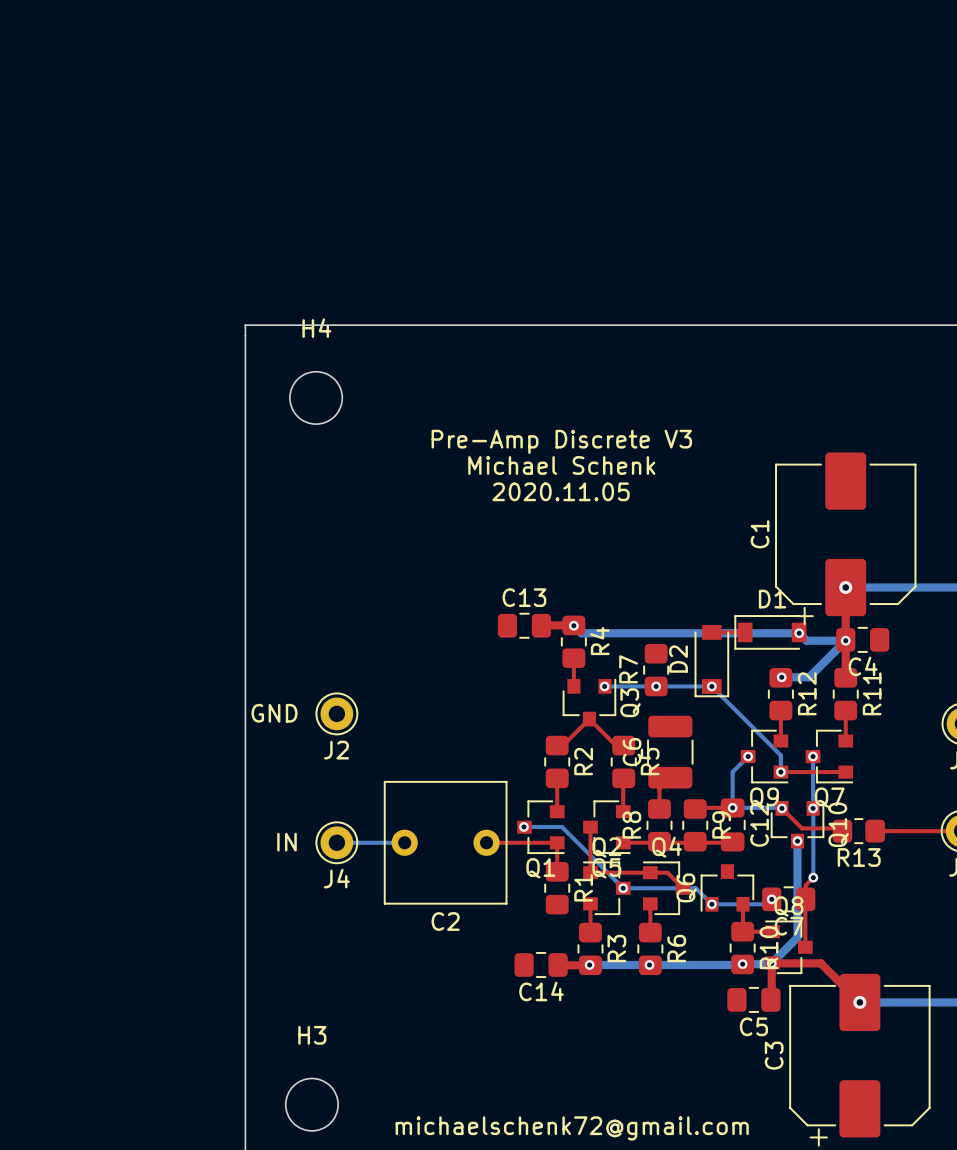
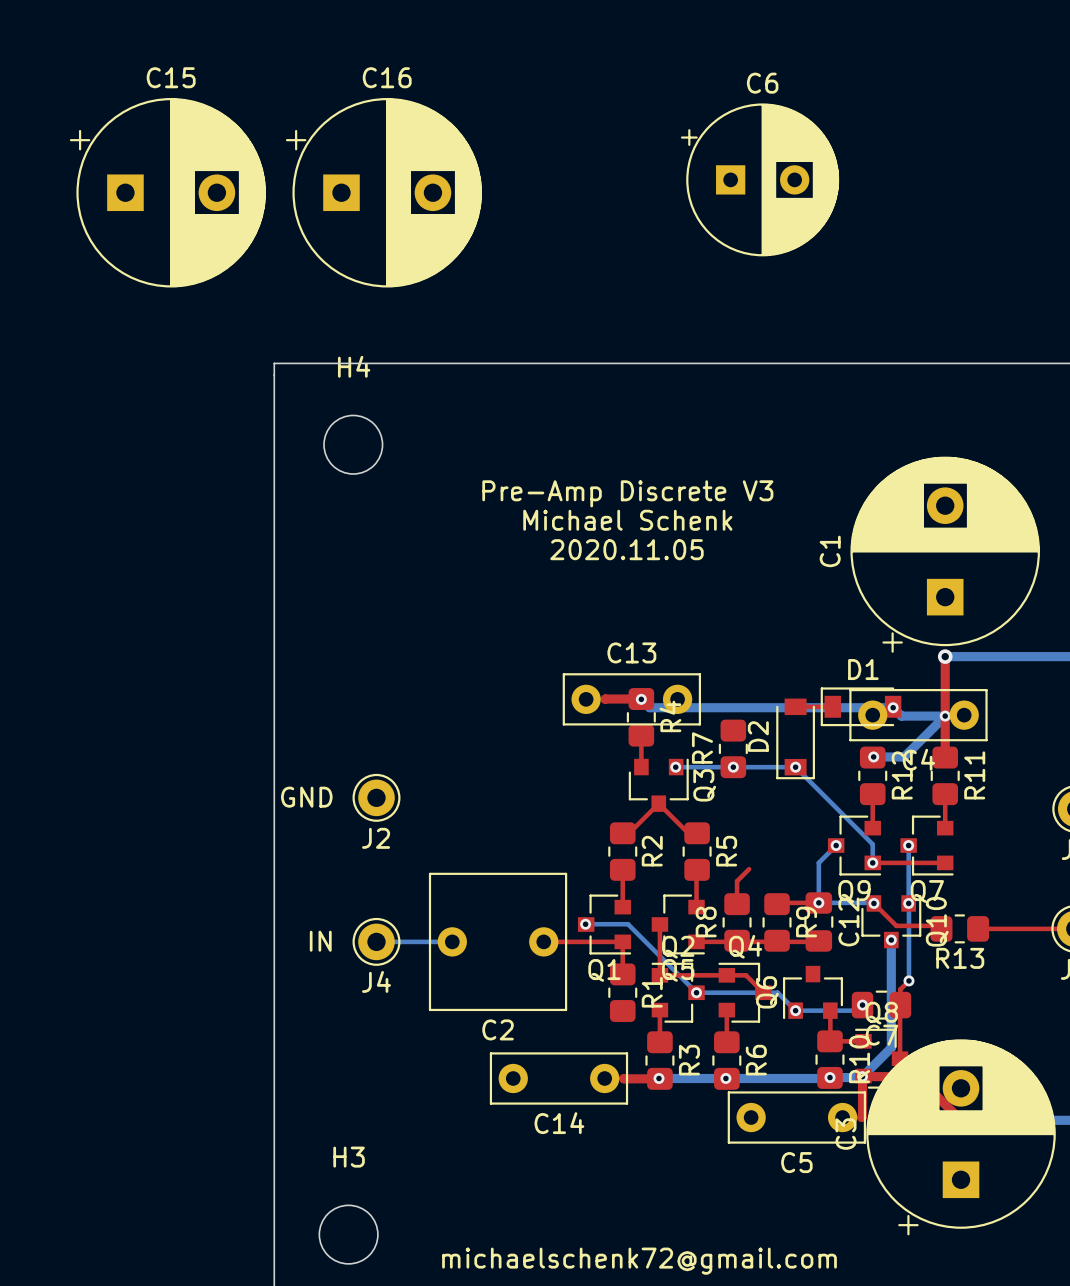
C15: none -> (167, 192)
C16: none -> (383, 192)
C1 footprint: [775, 452, 917, 626] -> [850, 456, 1040, 653]
C13 footprint: [497, 612, 552, 639] -> [562, 673, 702, 726]
C4 footprint: [836, 626, 890, 653] -> [849, 688, 988, 742]
C6 footprint: [647, 715, 694, 789] -> [680, 103, 840, 257]
C6 name position: C6 (632, 752) -> C6 (762, 83)
C14 footprint: [514, 951, 568, 979] -> [489, 1052, 629, 1105]
C3 footprint: [789, 973, 931, 1147] -> [866, 1039, 1056, 1236]
C5 footprint: [727, 986, 781, 1013] -> [727, 1091, 867, 1144]

